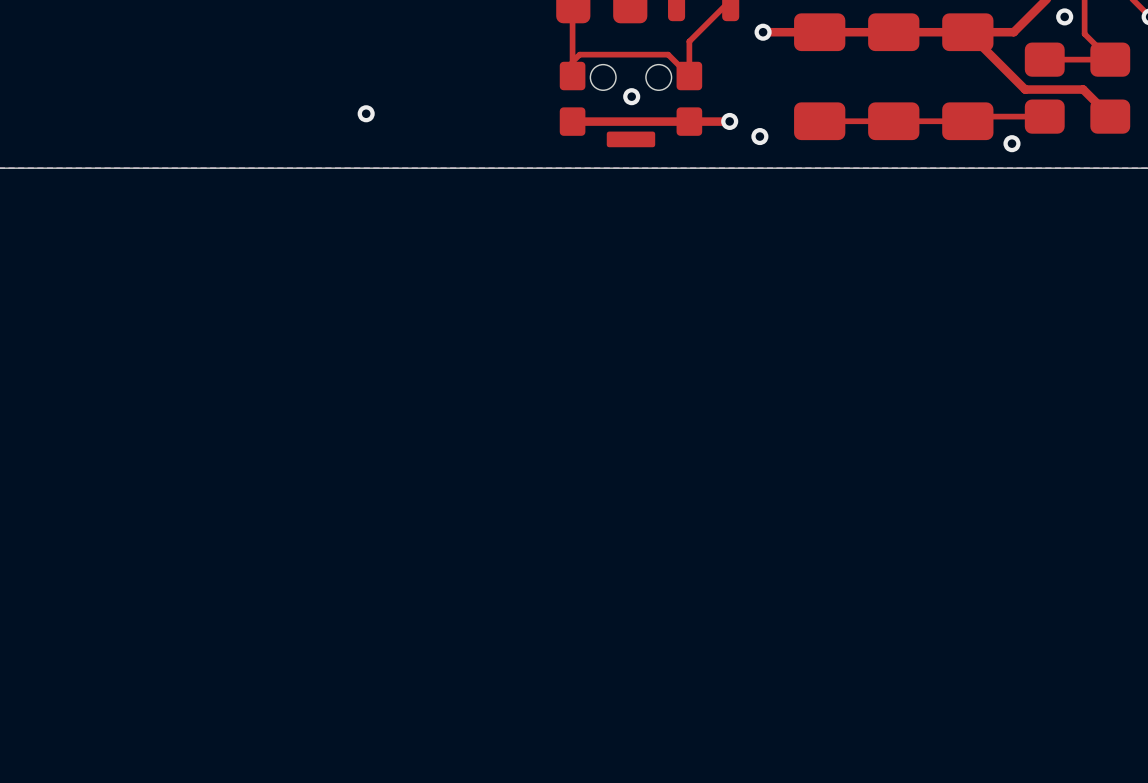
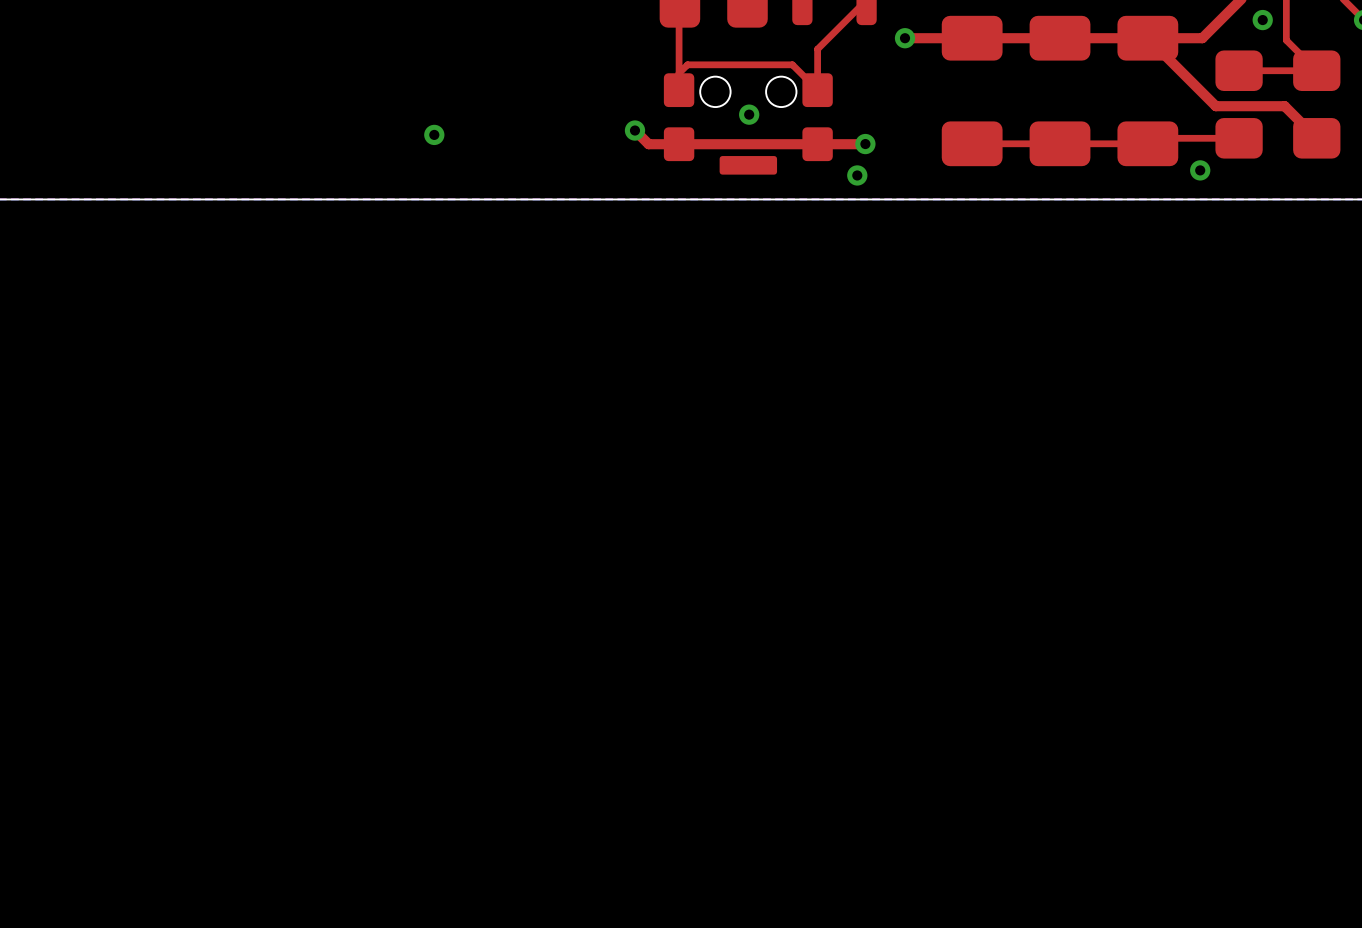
top track: none -> (634, 130) (648, 144) (679, 144)
via: none -> (634, 130)
via position: (759, 136) -> (857, 175)

